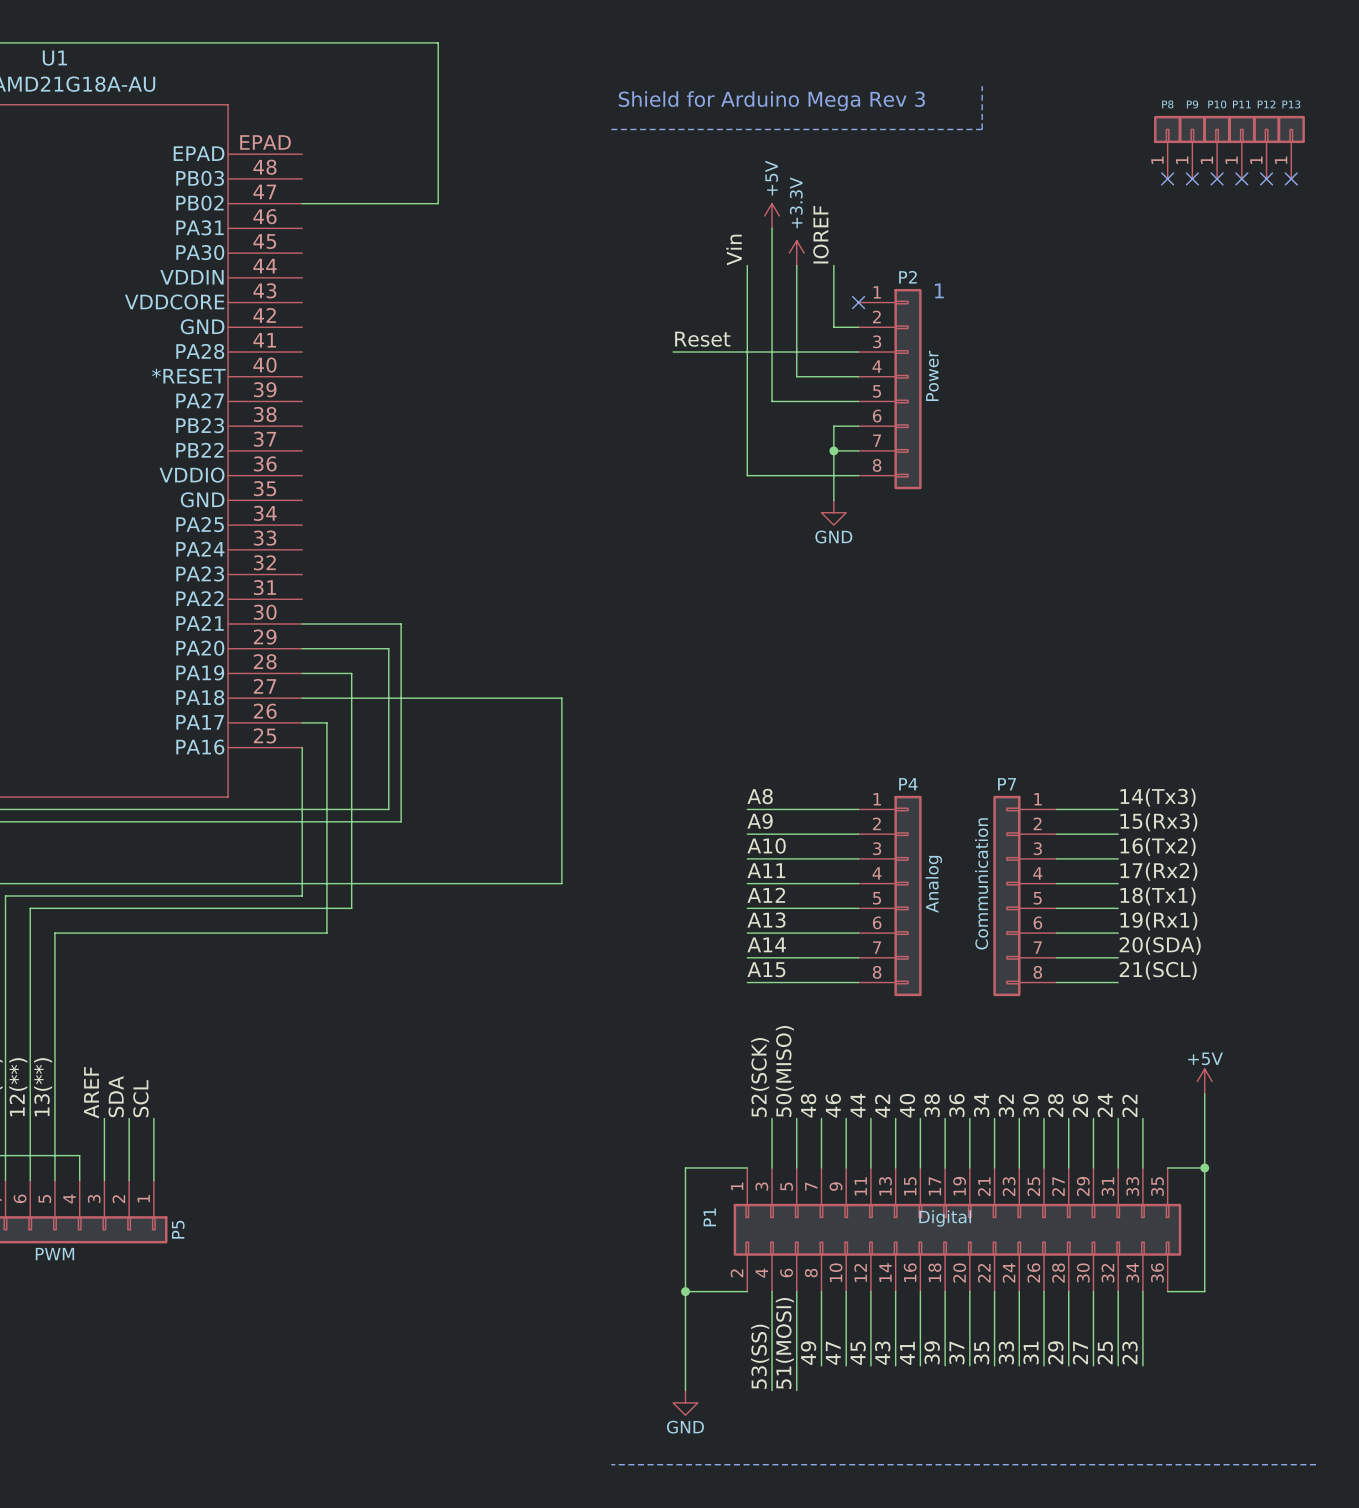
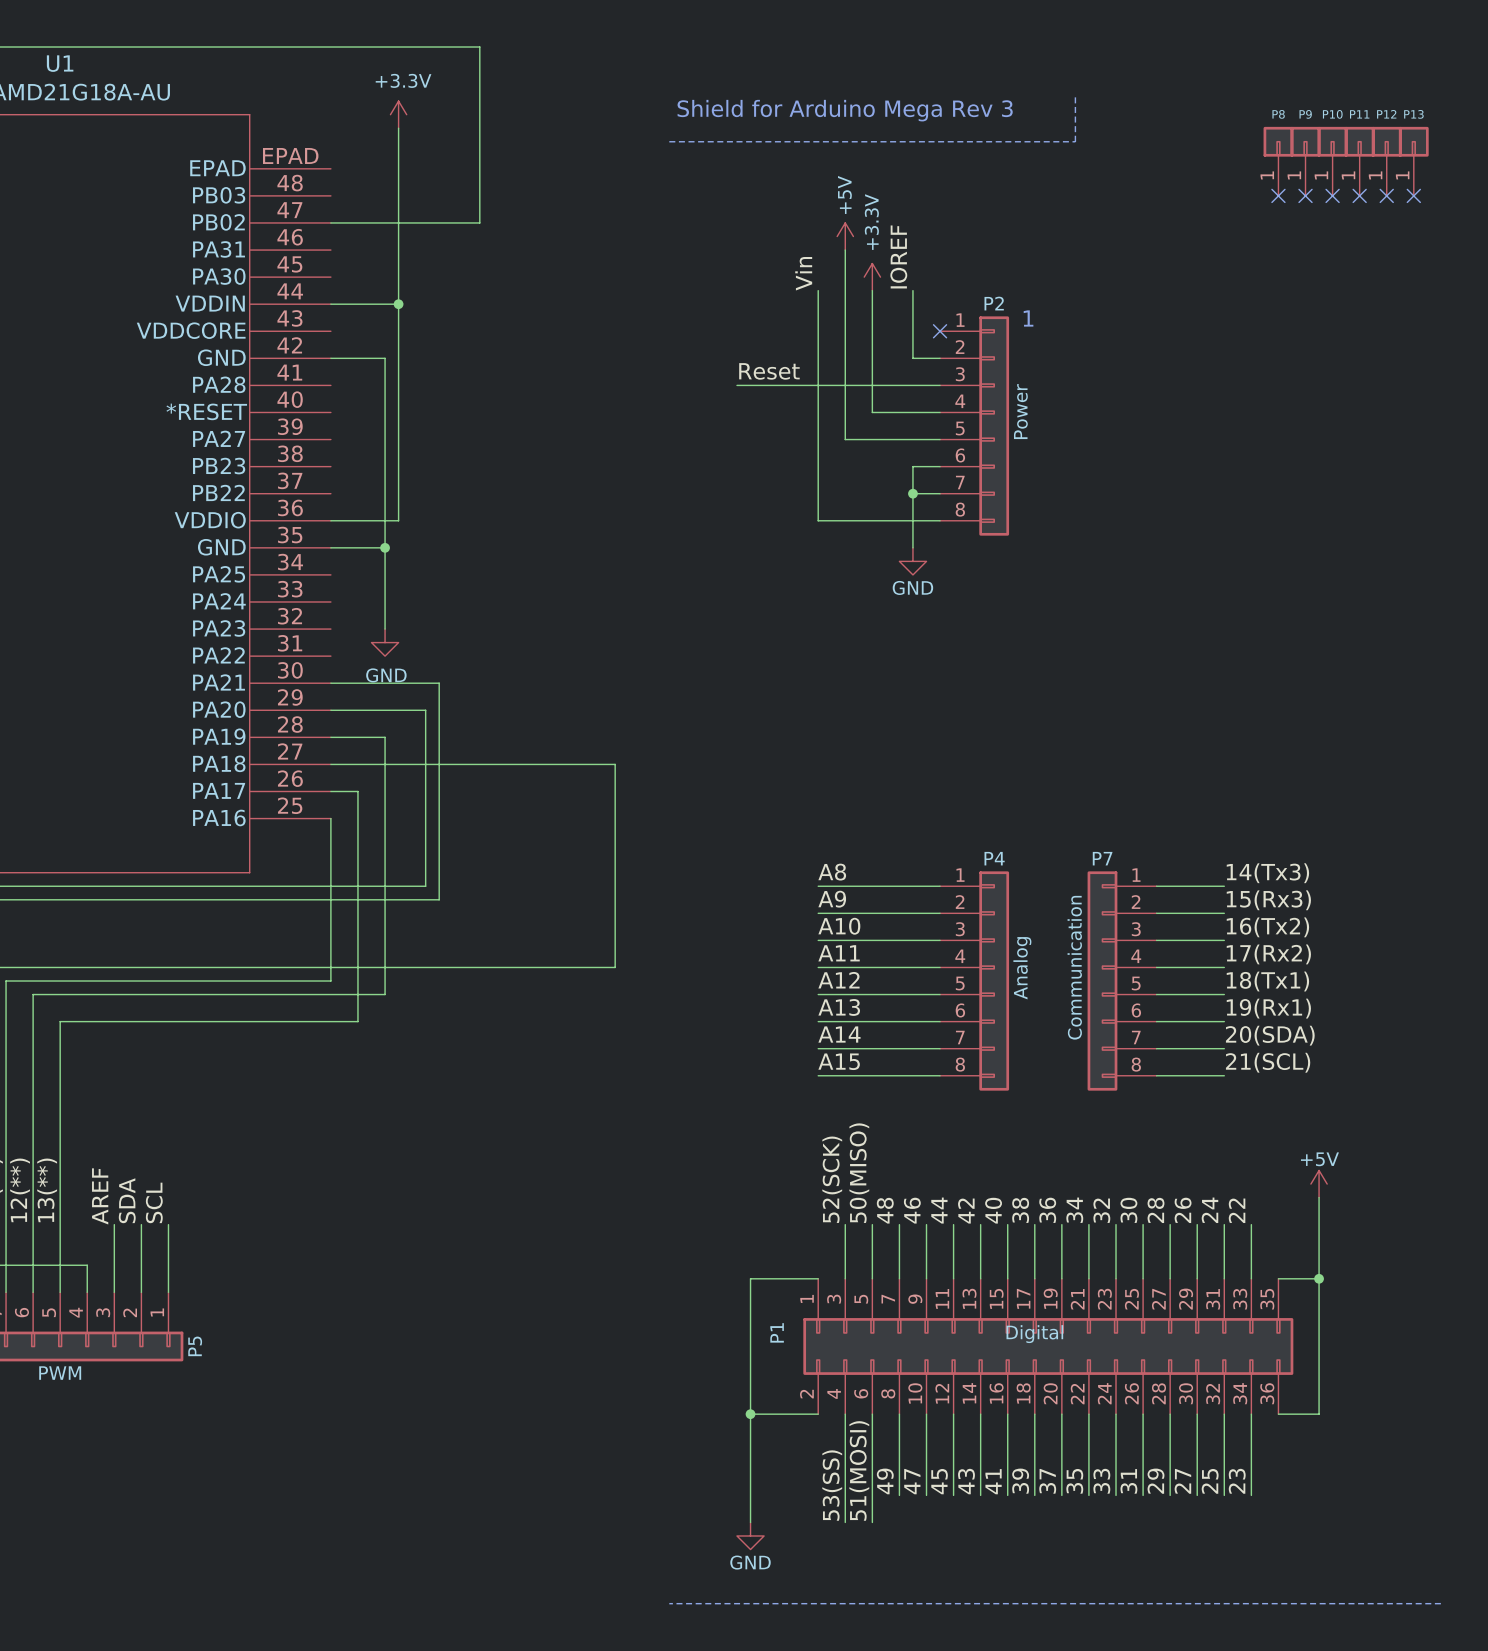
power symbol: none -> +3.3V (398, 114)
wire: none -> (398, 128) (398, 520) (330, 520)
wire: none -> (330, 304) (398, 304)
junction: none -> (398, 304)
wire: none -> (330, 358) (385, 358) (385, 629)
wire: none -> (330, 547) (385, 547)
junction: none -> (385, 547)
power symbol: none -> GND (385, 642)

